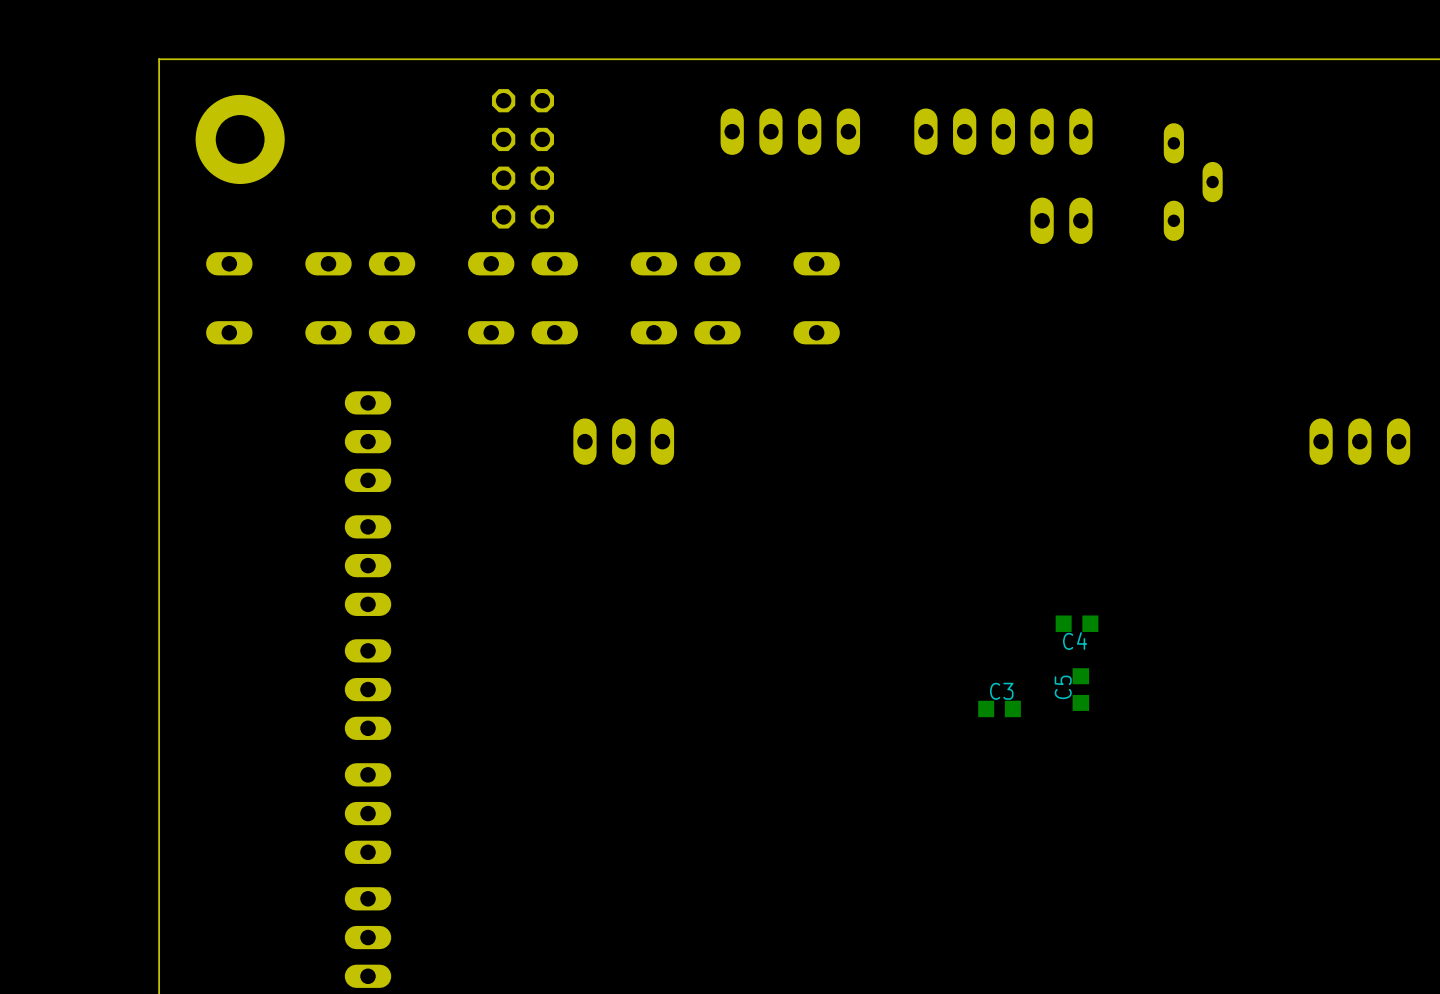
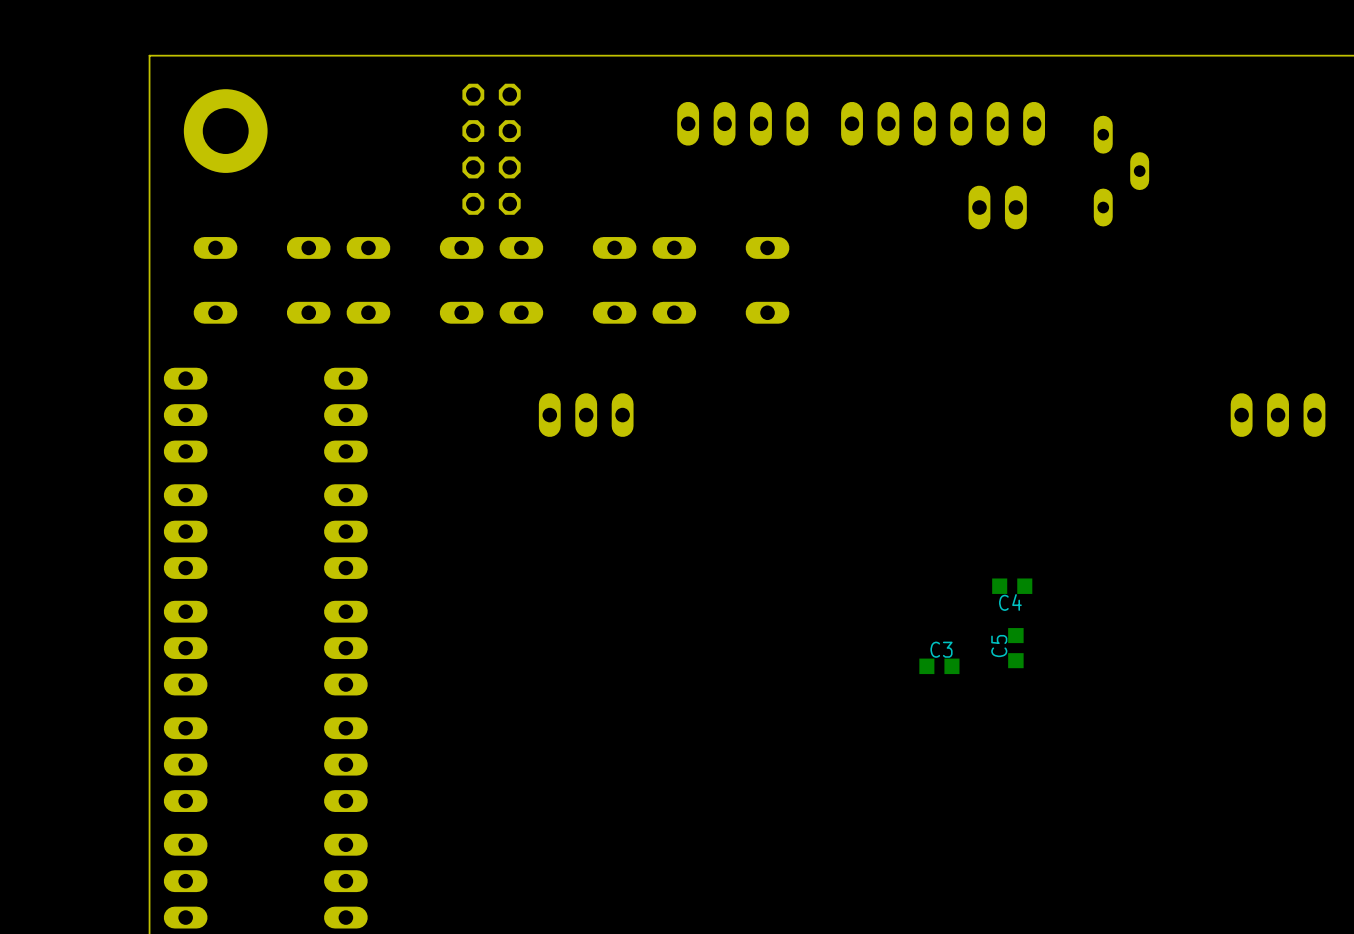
part footprint: [914, 108, 1093, 155] -> [841, 101, 1046, 146]
part: none -> (185, 415)
part: none -> (185, 531)
part: none -> (185, 648)
part: none -> (185, 764)
part: none -> (185, 881)

